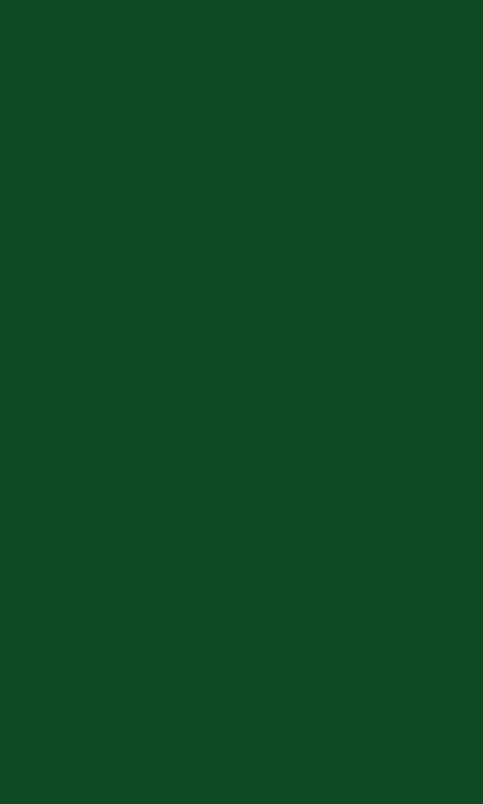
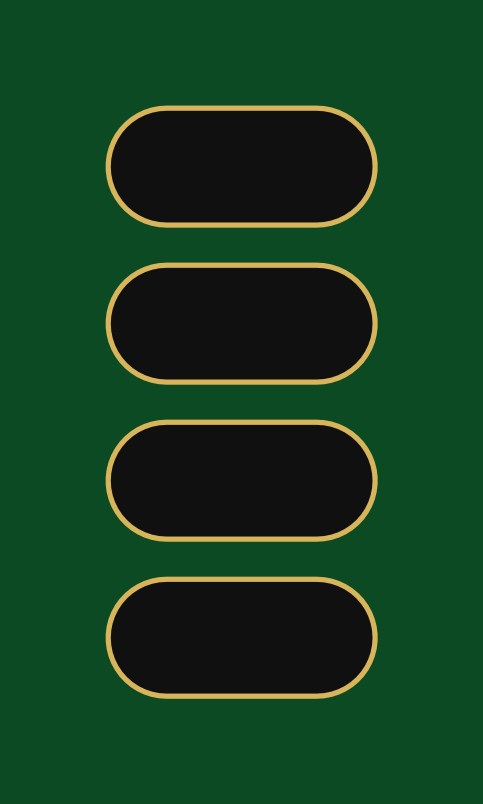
part: none -> (241, 166)
part: none -> (241, 323)
part: none -> (241, 480)
part: none -> (241, 637)

